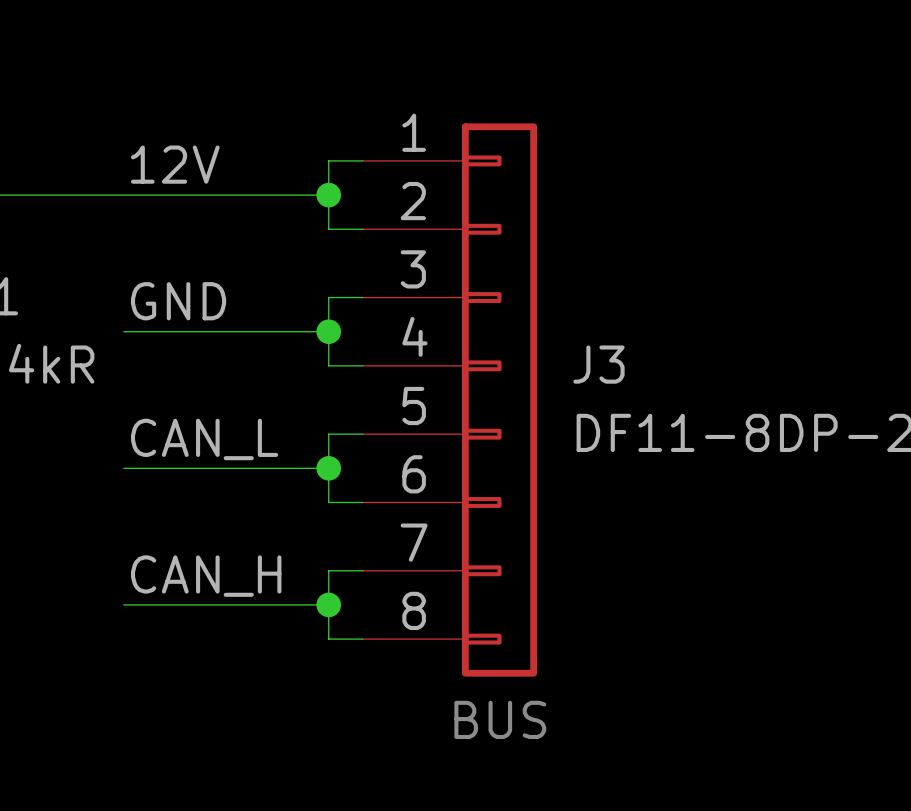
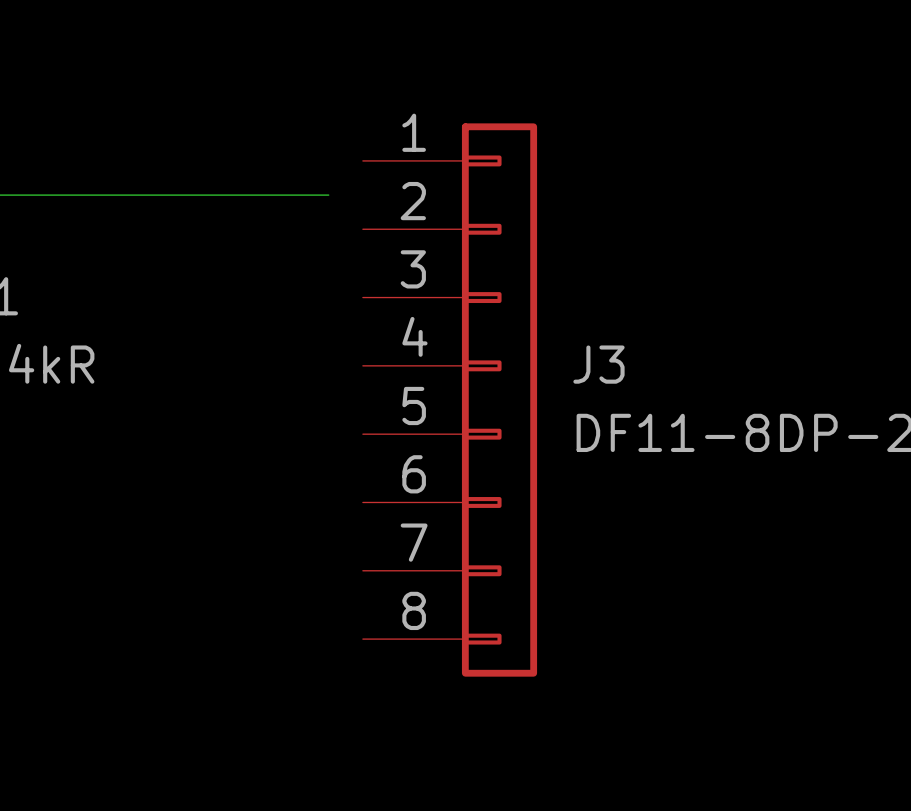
wire: (362, 160) (328, 160) (328, 229) (362, 229) -> none
label: 12V (175, 164) -> none
junction: (328, 195) -> none
wire: (362, 297) (328, 297) (328, 365) (362, 365) -> none
label: GND (178, 301) -> none
wire: (123, 331) (328, 331) -> none
junction: (328, 331) -> none
wire: (362, 434) (328, 434) (328, 502) (362, 502) -> none
label: CAN_L (204, 439) -> none
wire: (123, 468) (328, 468) -> none
junction: (328, 468) -> none
wire: (362, 570) (328, 570) (328, 639) (362, 639) -> none
label: CAN_H (206, 576) -> none
wire: (123, 604) (328, 604) -> none
junction: (328, 604) -> none
text: BUS (500, 719) -> none

